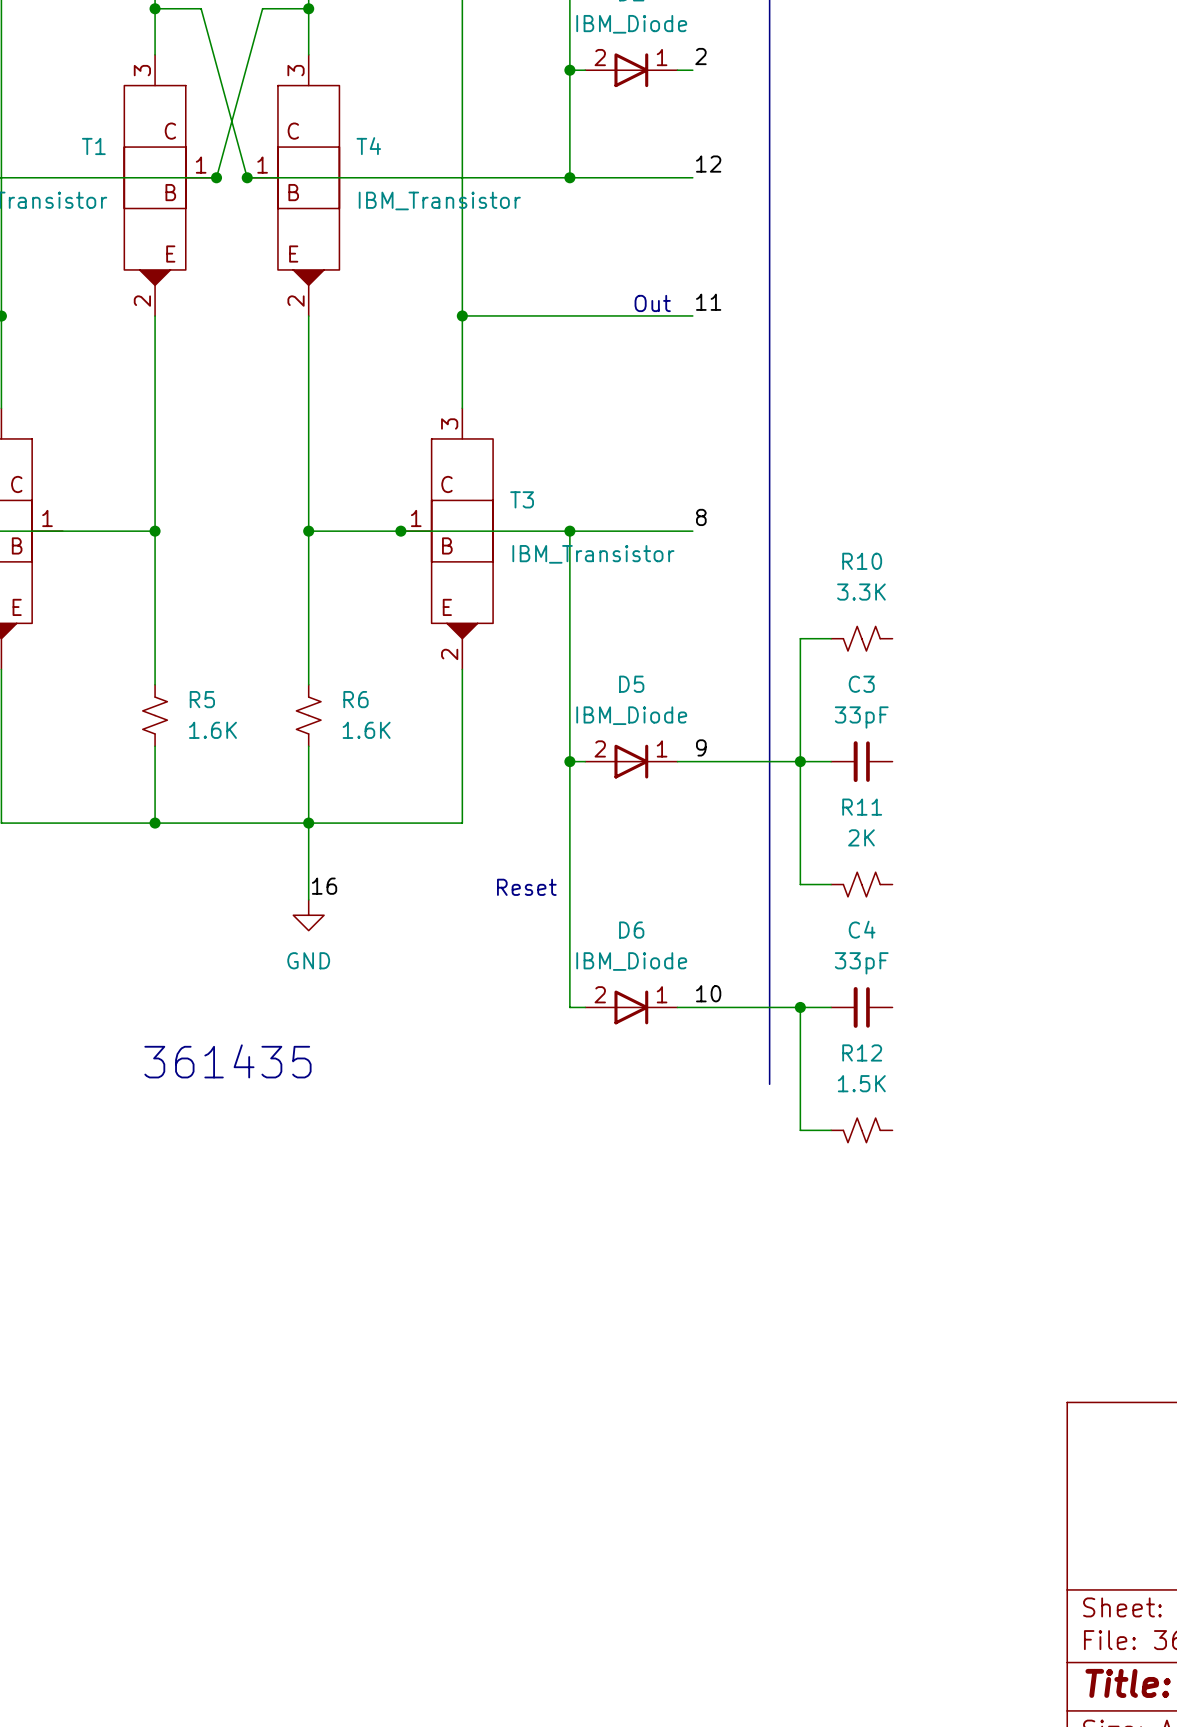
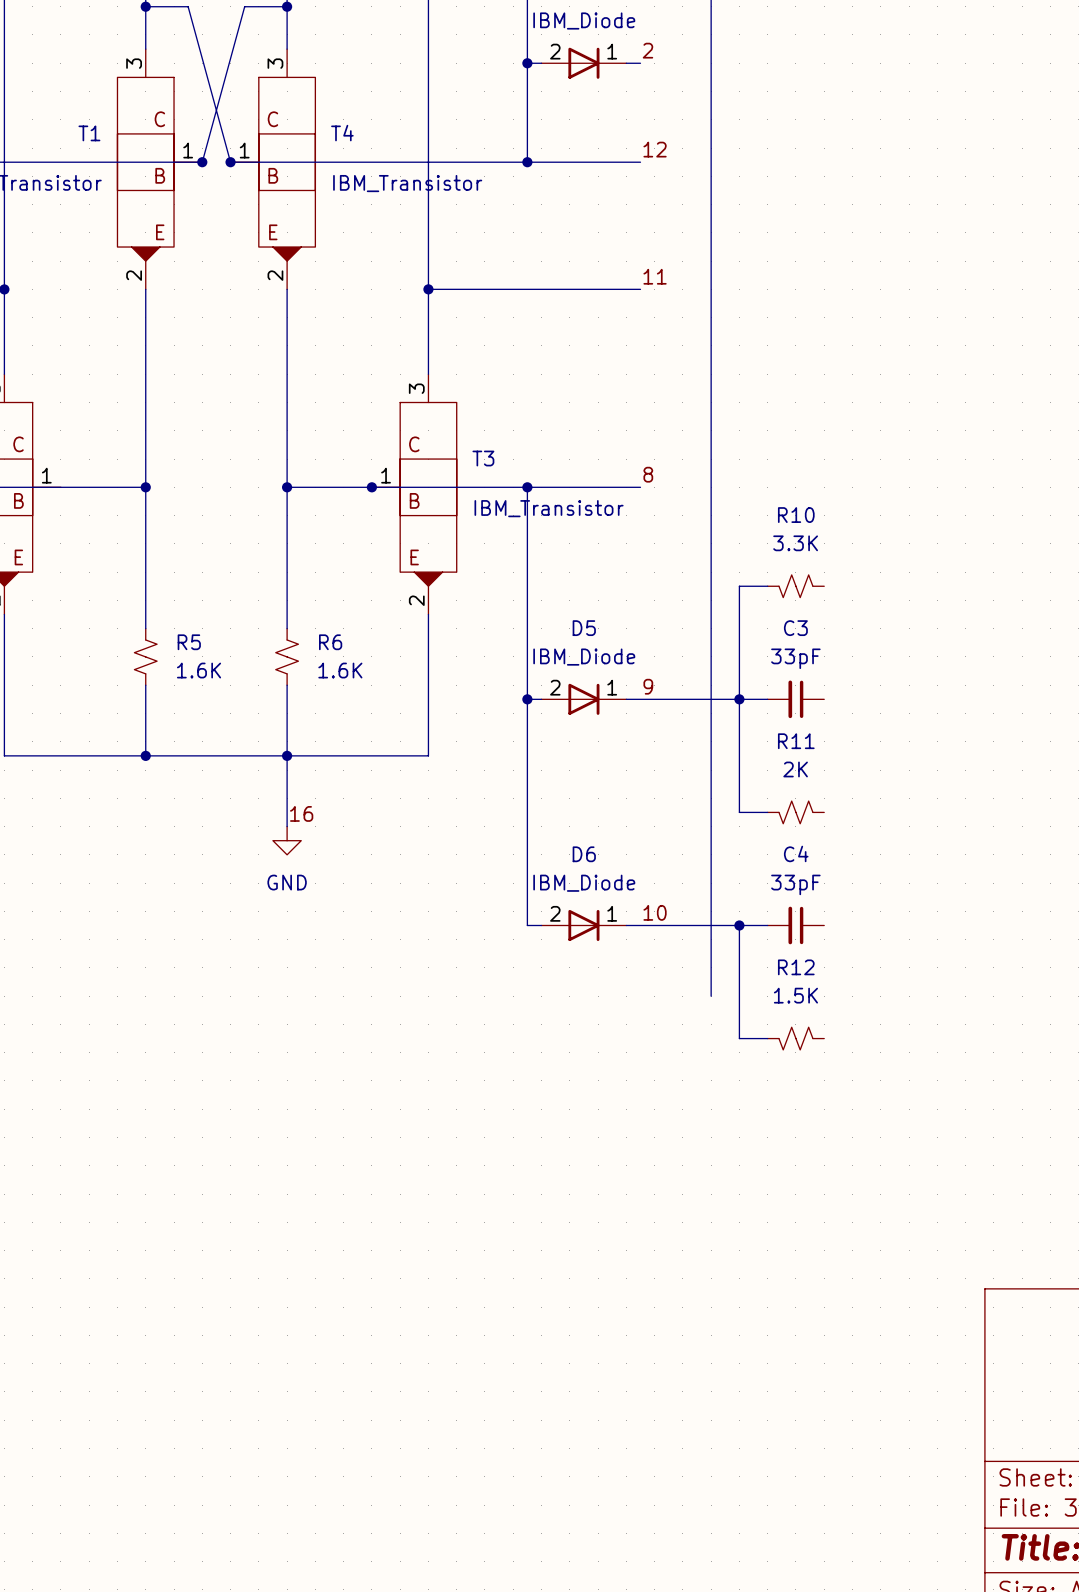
text: Out (652, 303) -> none
text: Reset (526, 887) -> none
text: 361435 (227, 1061) -> none

